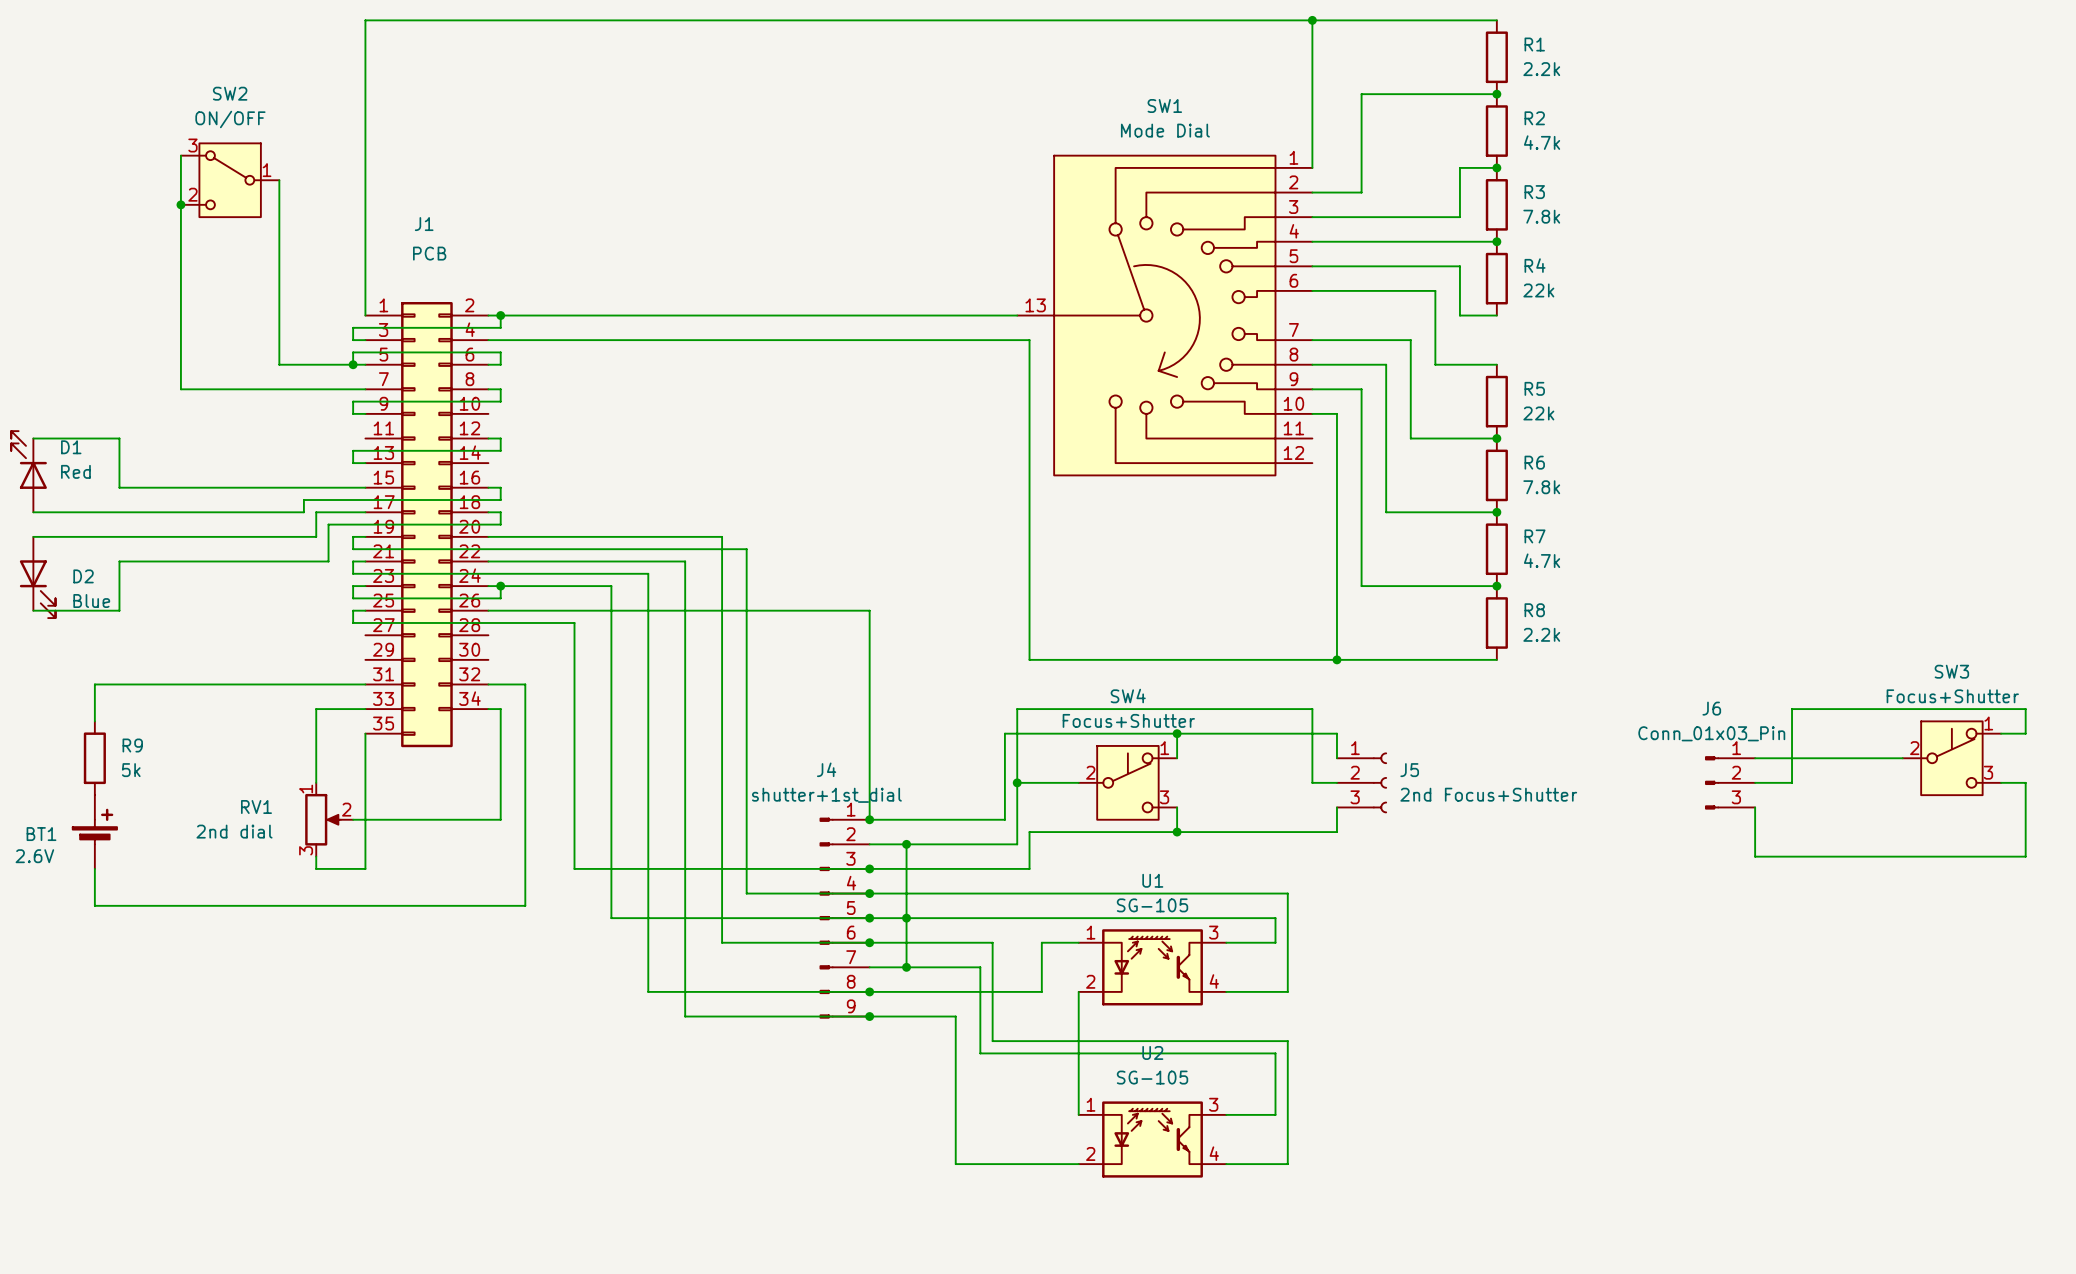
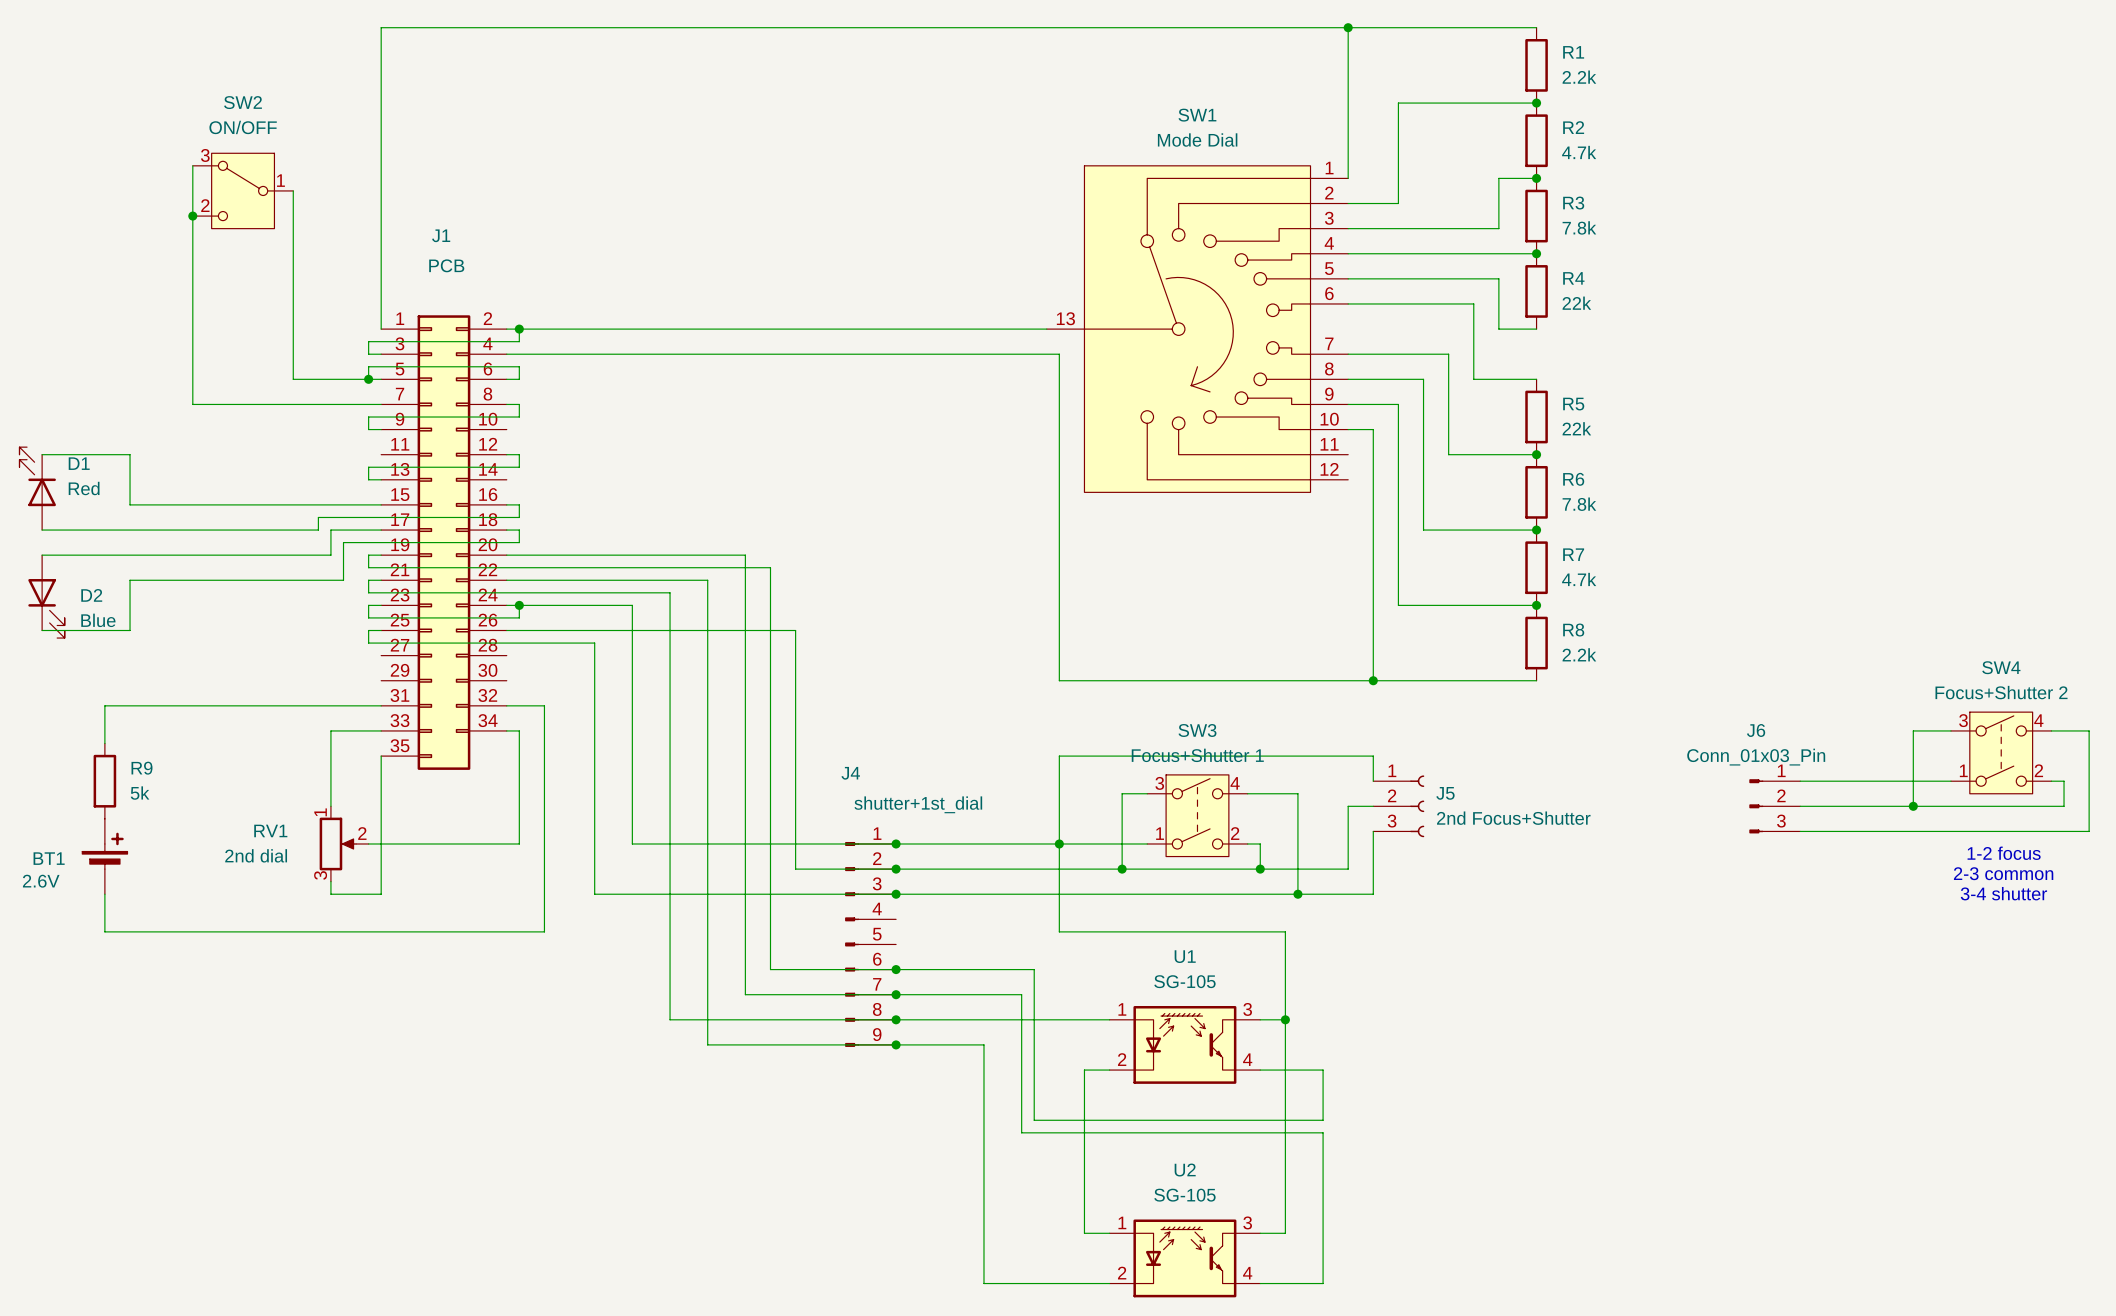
wire: (771, 610) (869, 610) (869, 819) -> (795, 630) (795, 869) (896, 869)
SW3 value: Focus+Shutter (1952, 696) -> Focus+Shutter 1 (1197, 755)
wire: (1865, 709) (1792, 709) (1792, 782) -> (1913, 730) (1913, 806)
wire: (2025, 709) (2025, 733) (2001, 733) -> none
SW4 value: Focus+Shutter (1128, 720) -> Focus+Shutter 2 (2001, 692)
SW3 symbol: [1902, 721, 2002, 796] -> [1147, 774, 1248, 857]
wire: (1029, 733) (1004, 733) (1004, 819) -> (1059, 756) (1059, 856)
wire: (1177, 733) (1177, 758) -> none
junction: (1177, 733) -> none
SW4 symbol: [1078, 745, 1178, 820] -> [1950, 712, 2052, 794]
wire: none -> (2051, 781) (2064, 781) (2064, 806)
J4 name position: J4 (826, 769) -> J4 (850, 773)
wire: none -> (1147, 793) (1122, 793) (1122, 869)
wire: none -> (1247, 793) (1297, 793) (1297, 894)
wire: (1017, 782) (1078, 782) -> none
junction position: (1017, 782) -> (1059, 843)
wire: (1312, 782) (1312, 709) (1017, 709) (1017, 844) -> (1348, 806) (1348, 869) (1046, 869)
wire: none -> (1837, 806) (2051, 806)
junction: none -> (1913, 806)
wire: (2013, 782) (2025, 782) (2025, 856) (1755, 856) (1755, 807) -> (2076, 730) (2089, 730) (2089, 831) (1800, 831)
J4 value position: shutter+1st_dial (826, 795) -> shutter+1st_dial (918, 804)
wire: (611, 819) (611, 918) (1275, 918) (1275, 942) (1226, 942) -> (632, 843) (896, 843)
wire: none -> (1034, 843) (1147, 843)
wire: none -> (1247, 843) (1260, 843) (1260, 869)
text: none -> 1-2 focus (2004, 853)
wire: (1029, 832) (1336, 832) -> (1260, 1233) (1285, 1233) (1285, 931) (1059, 931) (1059, 894) (1373, 894) (1373, 856)
junction: (1177, 832) -> none
junction: none -> (896, 869)
wire: (906, 844) (906, 967) -> none
junction: (906, 844) -> none
junction: none -> (1122, 869)
junction: none -> (1260, 869)
text: none -> 2-3 common (2003, 873)
junction: none -> (1297, 894)
text: none -> 3-4 shutter (2003, 893)
wire: (746, 893) (1287, 893) (1287, 991) (1250, 991) -> none
junction: (869, 893) -> none
junction: (869, 918) -> none
junction: (906, 918) -> none
wire: (722, 942) (746, 942) -> (770, 919) (770, 969)
wire: none -> (745, 969) (745, 994) (896, 994)
wire: (992, 942) (992, 967) -> (1009, 994) (1021, 994)
wire: none -> (1021, 969) (1034, 969) (1034, 1120) (1323, 1120)
wire: (1078, 942) (1041, 942) (1041, 991) -> (1109, 1019) (1071, 1019)
junction: none -> (896, 994)
junction: (906, 967) -> none
wire: (980, 967) (980, 1053) (1275, 1053) (1275, 1114) (1226, 1114) -> none
U1 position: (1152, 967) -> (1184, 1044)
wire: (1078, 991) (1078, 1114) -> none
junction: none -> (1285, 1019)
wire: (992, 1041) (1054, 1041) -> (1109, 1233) (1084, 1233) (1084, 1070)
wire: (1287, 1090) (1287, 1102) -> (1021, 1070) (1021, 1132) (1323, 1132)
U2 position: (1152, 1139) -> (1184, 1258)
wire: (955, 1164) (1078, 1164) -> (983, 1195) (983, 1283) (1109, 1283)
wire: (1226, 1164) (1287, 1164) -> (1260, 1283) (1323, 1283) (1323, 1195)

